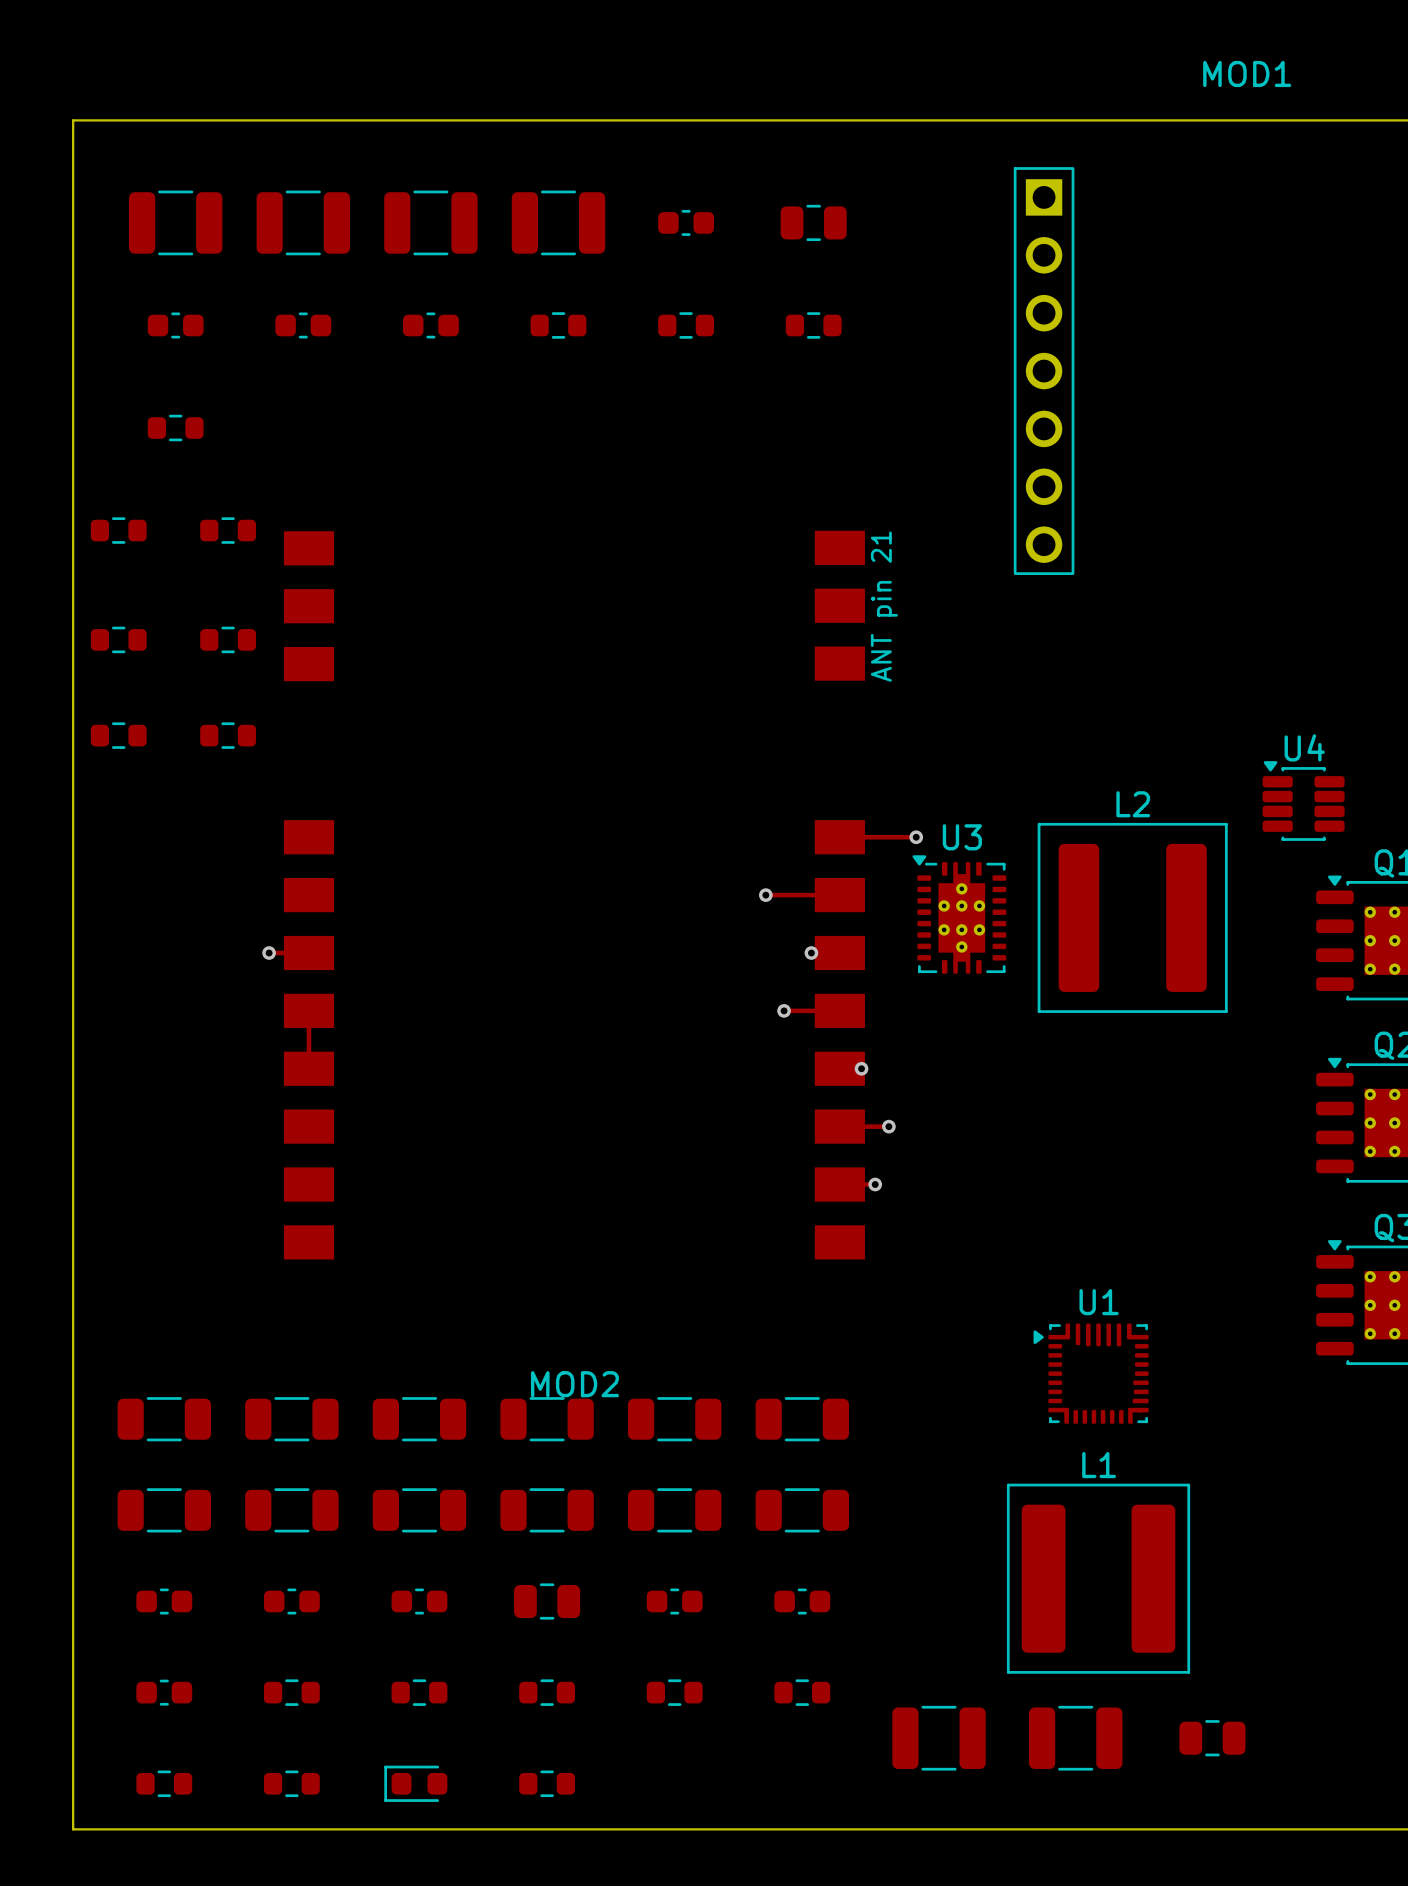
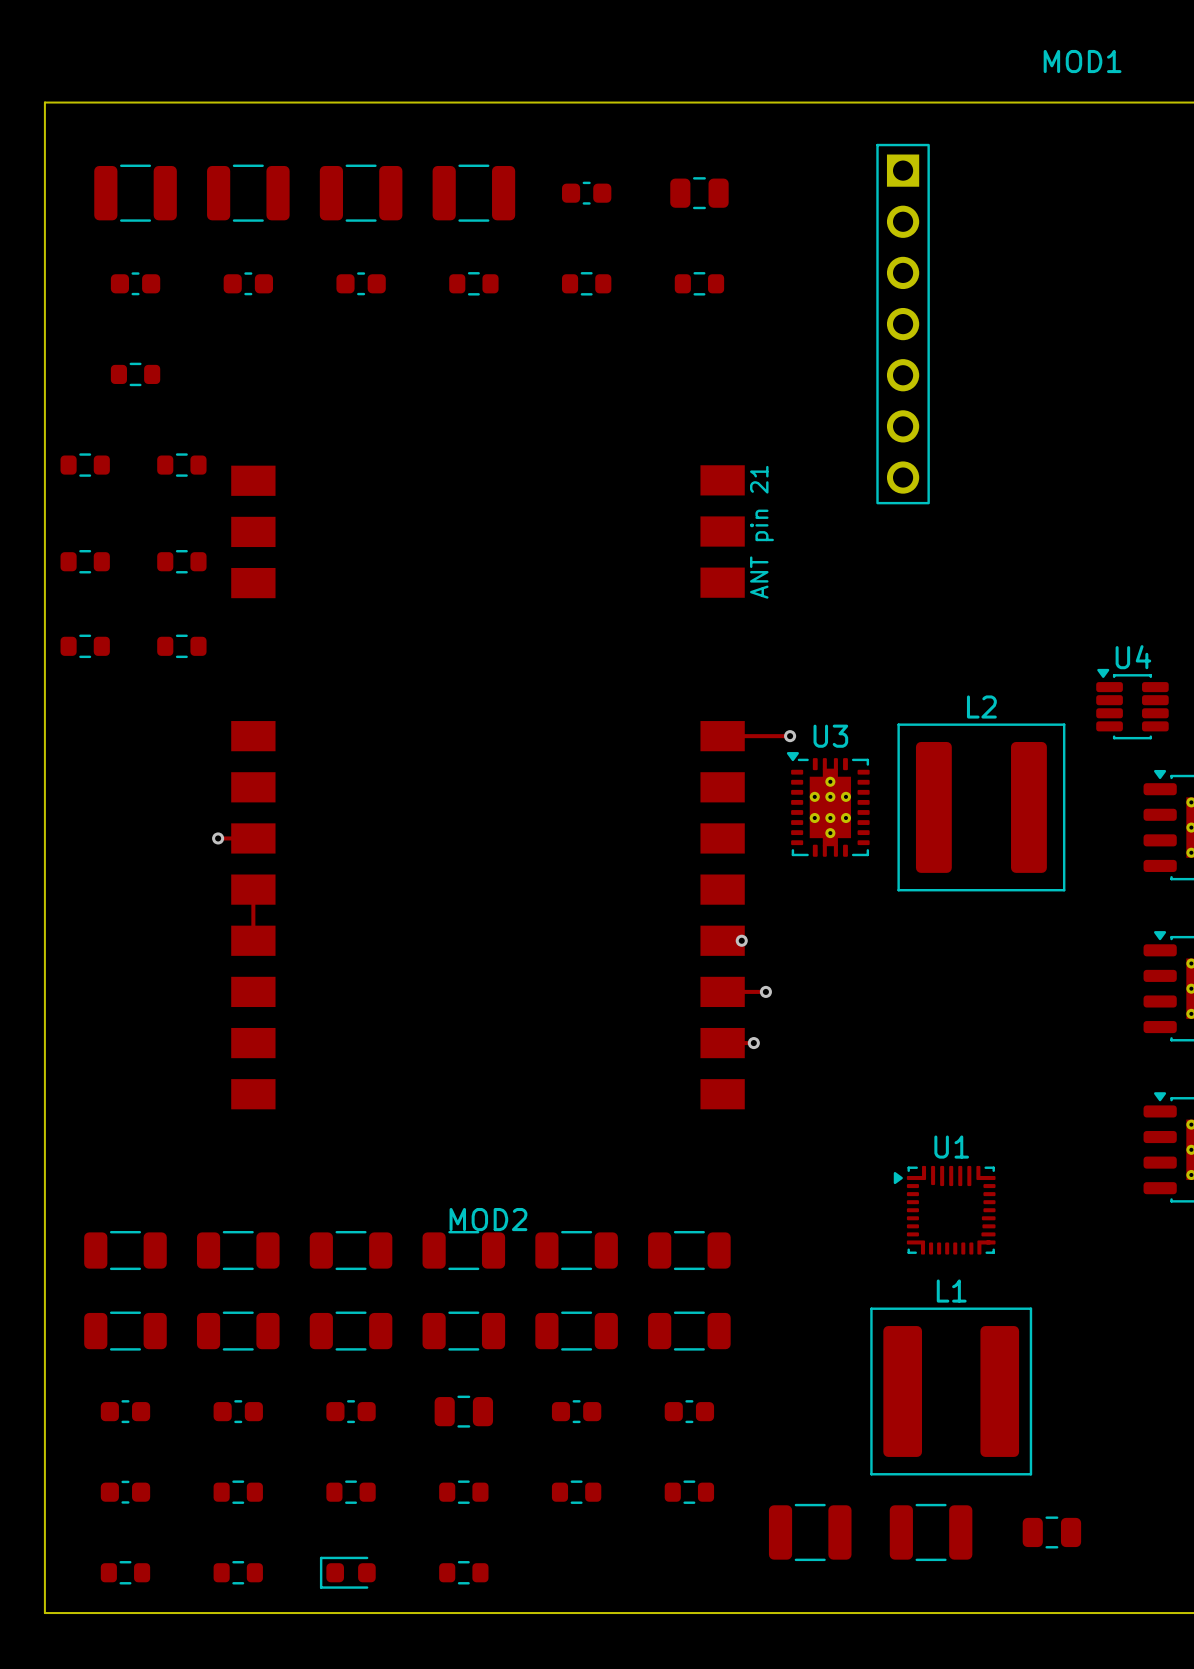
track: (765, 895) (839, 895) -> none
via: (765, 895) -> none
via: (811, 953) -> none
track: (784, 1010) (839, 1010) -> none
via: (784, 1010) -> none

